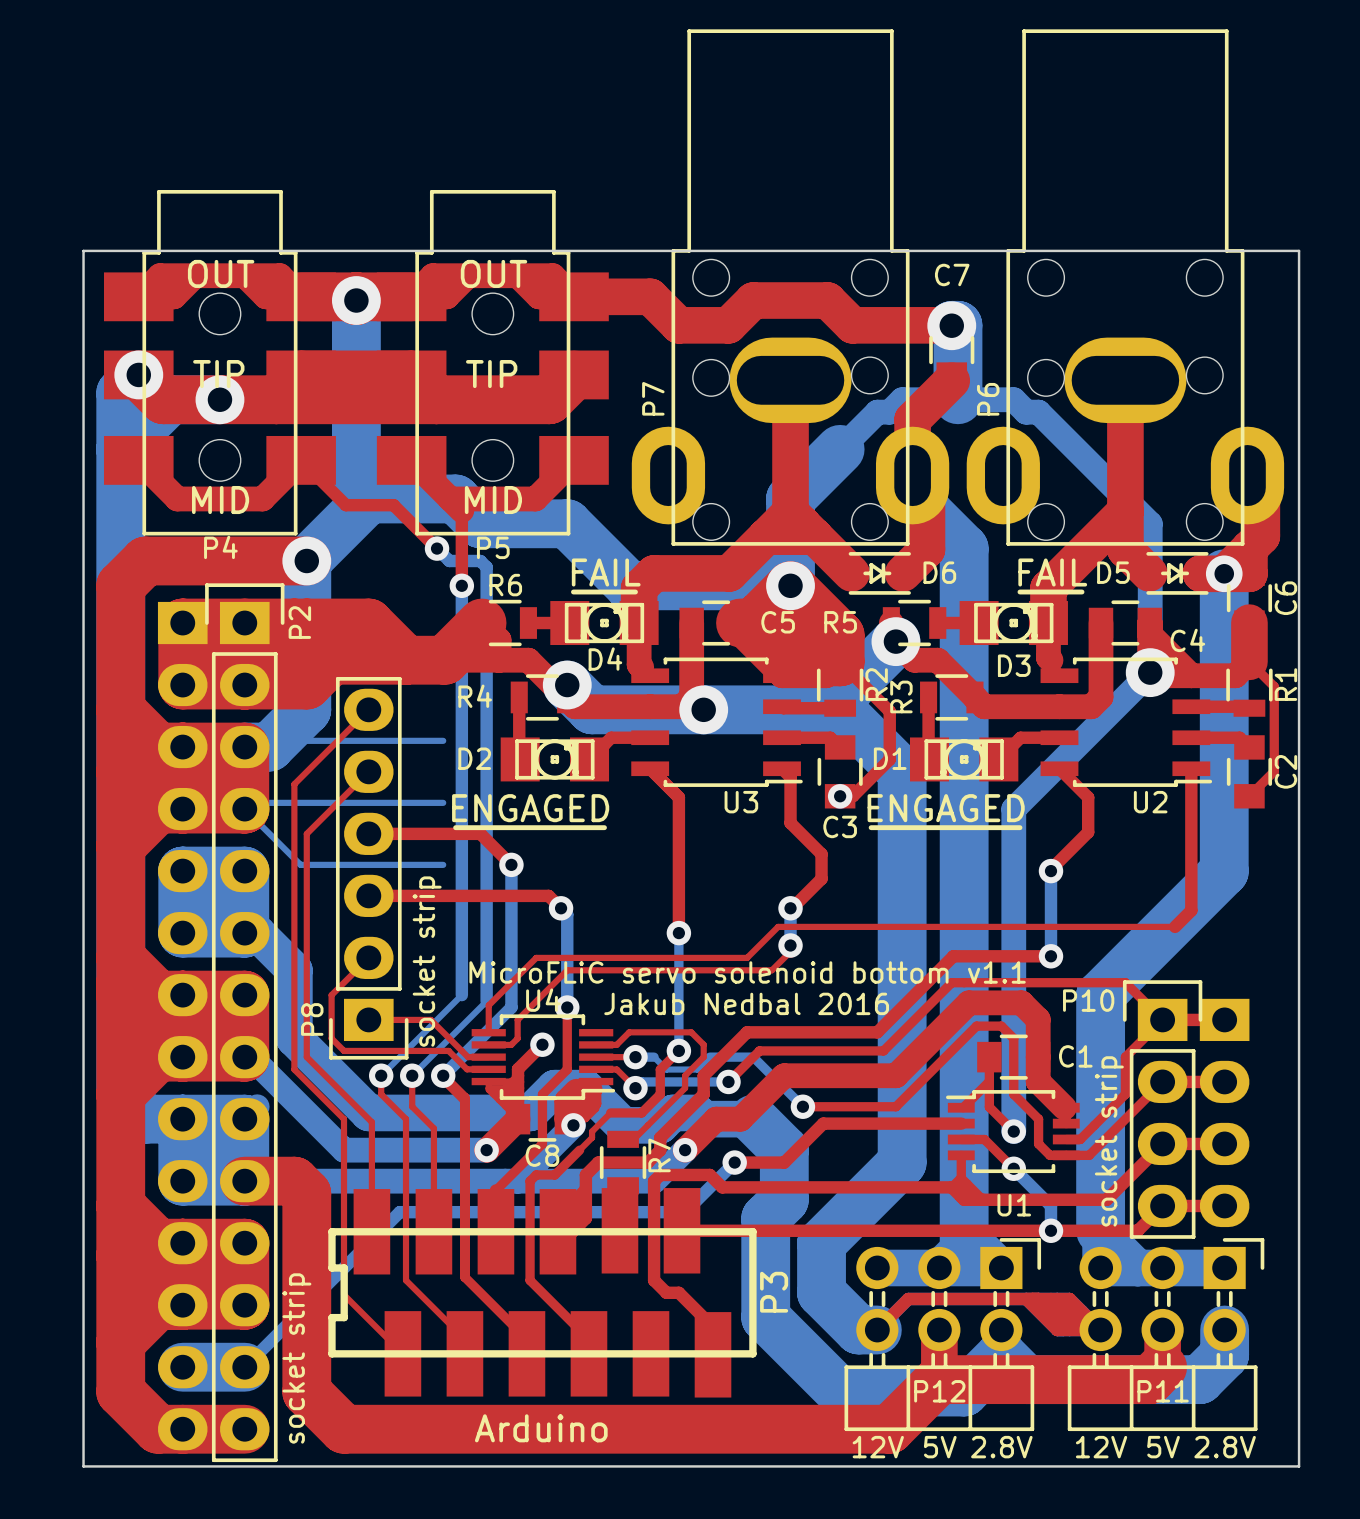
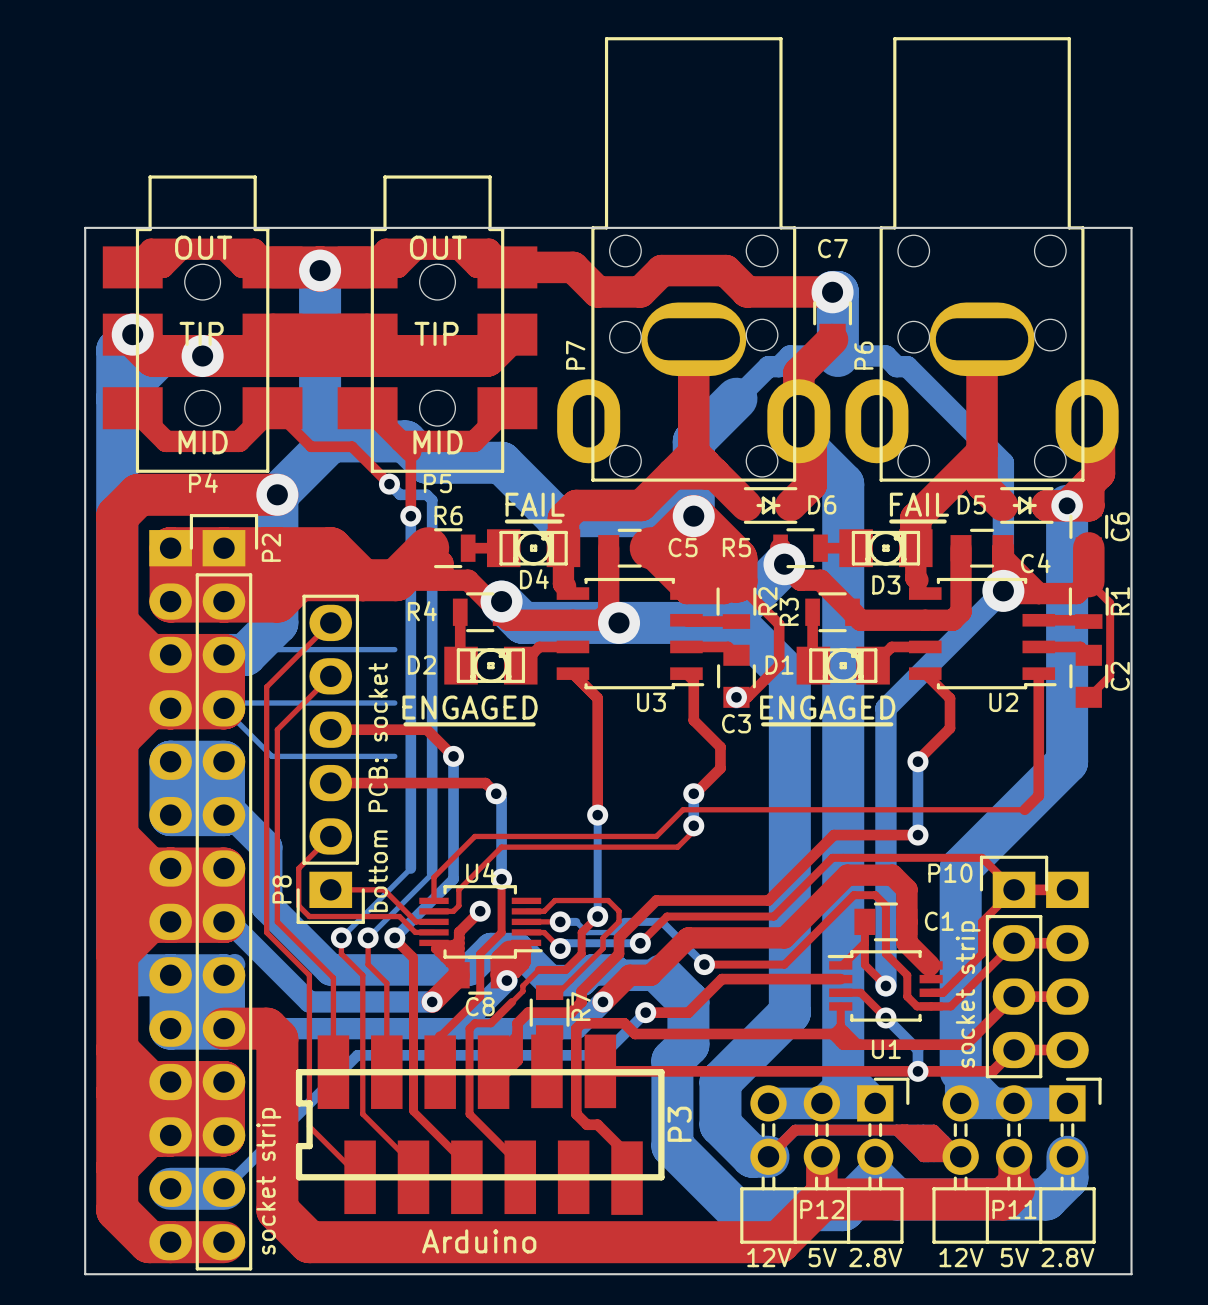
text: socket strip (427, 961) -> bottom PCB: socket (378, 787)
text: MicroFLiC servo solenoid bottom v1.1 (747, 972) -> none
text: Jakub Nedbal 2016 (746, 1003) -> none

